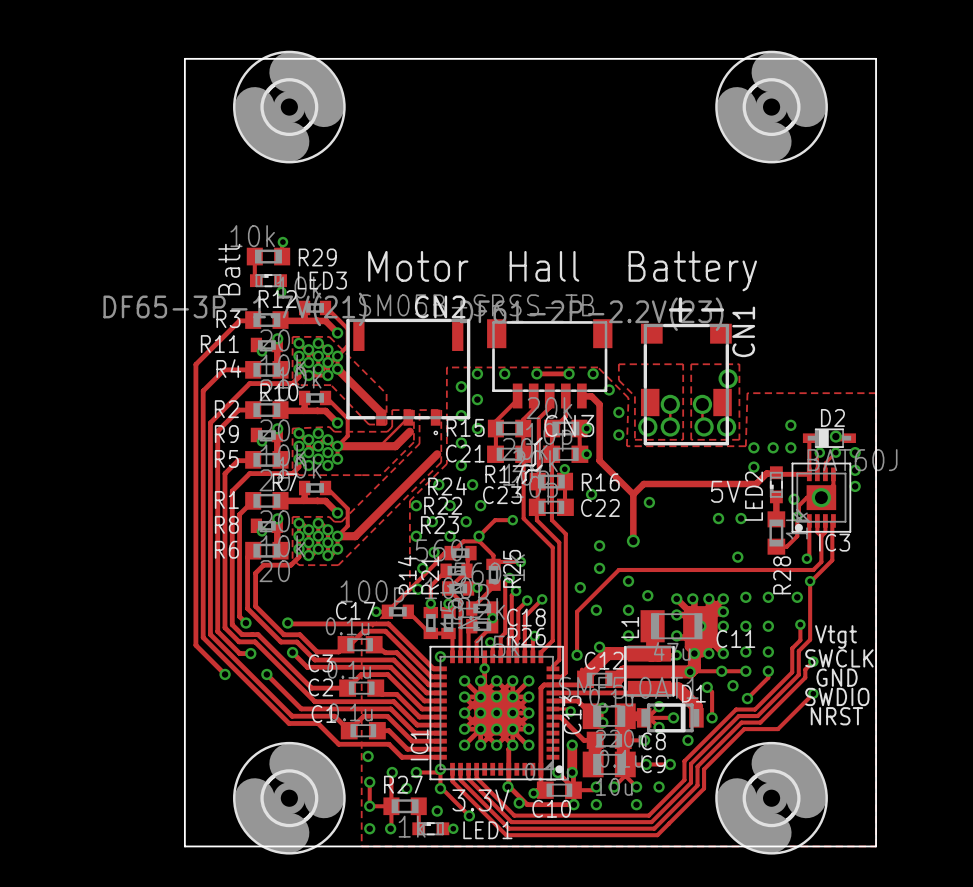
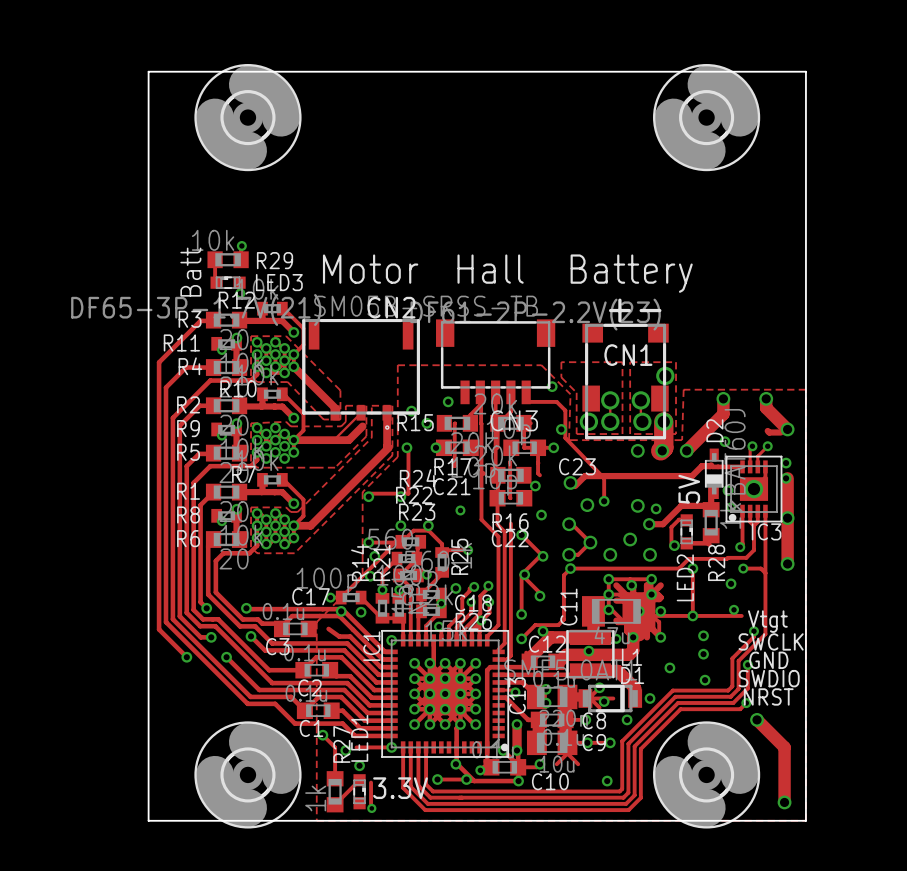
CN1 name rotation: 0° (743, 331) -> 90° clockwise (628, 355)
CN1 name position: CN1 (743, 331) -> CN1 (628, 355)
via: (477, 373) -> none
via: (504, 373) -> none
track: (536, 373) (569, 373) -> none
via: (536, 373) -> none
via: (569, 373) -> none
via: (593, 373) -> none
via: (461, 386) -> none
track: (581, 395) (591, 396) (599, 404) (599, 460) (633, 494) (633, 541) -> (526, 392) (527, 401) (556, 401) (565, 410) (565, 438) (604, 478) (604, 501)
via: (477, 399) -> none
track: (517, 399) (495, 421) (495, 454) -> none
track: none -> (723, 398) (723, 414) (686, 450)
via: none -> (723, 398)
track: none -> (766, 398) (766, 408) (787, 429)
via: none -> (766, 398)
via: none -> (448, 401)
track: (549, 407) (538, 418) (536, 520) (551, 535) -> (495, 403) (497, 524)
via: (618, 412) -> none
track: none -> (387, 413) (388, 447)
via: (790, 425) -> none
track: (520, 426) (523, 428) (523, 518) (534, 529) -> (480, 392) (481, 519)
track: none -> (663, 421) (663, 447) (660, 450)
track: none -> (455, 423) (454, 466)
via: (586, 428) -> none
via: none -> (787, 429)
via: (835, 436) -> none
line: (541, 438) (535, 444) (535, 463) (524, 465) -> none
track: (809, 438) (809, 474) -> none
D2 rotation: 0° (829, 438) -> 90° counterclockwise (714, 473)
D2 position: (829, 438) -> (714, 473)
via: (461, 443) -> none
via: (753, 447) -> none
via: (773, 447) -> none
via: (855, 452) -> none
C21 name position: C21 (465, 453) -> C21 (452, 486)
track: none -> (406, 447) (408, 493) (370, 493)
via: none -> (406, 447)
via: none -> (436, 447)
track: (551, 454) (551, 520) (565, 534) -> none
C23 position: (565, 454) -> (524, 447)
via: (586, 454) -> none
track: none -> (553, 447) (538, 447) (538, 473) (539, 475)
via: none -> (553, 447)
via: none -> (637, 450)
via: none -> (662, 450)
via: none -> (686, 450)
via: (461, 465) -> none
line: (541, 465) (536, 470) (528, 470) (522, 483) -> none
via: (753, 467) -> none
via: (564, 469) -> none
R16 position: (551, 481) -> (510, 475)
R16 name position: R16 (600, 482) -> R16 (510, 521)
via: (438, 484) -> none
via: (472, 484) -> none
LED2 rotation: 0° (776, 484) -> 180° (686, 531)
LED2 position: (776, 484) -> (686, 531)
R24 name position: R24 (447, 486) -> R24 (418, 478)
track: none -> (787, 478) (787, 563)
via: none -> (570, 482)
text rotation: 0° (725, 491) -> 90° counterclockwise (689, 489)
C23 name position: C23 (502, 495) -> C23 (577, 466)
LED2 name position: LED2 (754, 496) -> LED2 (685, 577)
track: (821, 497) (806, 497) (798, 505) (797, 536) (786, 546) (776, 546) -> none
via position: (649, 502) -> (604, 501)
R22 name position: R22 (443, 505) -> R22 (414, 495)
via: (480, 505) -> none
C22 position: (551, 507) -> (510, 498)
C22 name position: C22 (600, 507) -> C22 (510, 538)
via: none -> (587, 505)
via: none -> (637, 505)
track: none -> (708, 505) (681, 505) (662, 524) (649, 524)
via: (741, 518) -> none
track: (512, 520) (495, 520) (479, 536) -> none
track: (833, 520) (832, 560) (811, 581) -> (765, 573) (760, 568) (744, 568)
via: (432, 521) -> none
via: (466, 521) -> none
via: none -> (541, 515)
R23 name position: R23 (439, 525) -> R23 (417, 512)
via: none -> (787, 518)
track: none -> (686, 520) (679, 519) (671, 527) (671, 547)
track: none -> (569, 524) (572, 524) (590, 542) (578, 554) (569, 554)
via: none -> (569, 524)
via: (416, 536) -> none
via position: (633, 541) -> (649, 524)
track: none -> (521, 534) (541, 554) (521, 574)
via: none -> (521, 534)
via: (599, 545) -> none
via: none -> (630, 539)
via: (434, 552) -> none
via: none -> (368, 542)
track: none -> (400, 541) (368, 542)
via: none -> (590, 542)
track: none -> (686, 543) (709, 544)
via: none -> (569, 554)
via: none -> (610, 554)
via: none -> (650, 554)
track: (794, 569) (618, 569) (577, 611) -> (727, 557) (688, 558) (679, 568) (570, 568) (563, 575) (563, 619) (558, 625) (535, 625) (520, 638)
via: none -> (787, 563)
track: (509, 578) (505, 582) (505, 632) (500, 637) (500, 641) -> (469, 588) (469, 591) (462, 598) (462, 613) (449, 626)
via: (509, 578) -> none
track: none -> (692, 568) (692, 615)
via: none -> (692, 568)
track: (810, 581) (810, 639) (798, 651) (798, 674) (757, 716) -> (765, 511) (765, 634) (738, 661) (738, 688) (730, 696) (693, 696)
track: none -> (521, 574) (521, 597)
track: none -> (521, 574) (541, 594)
track: (516, 590) (511, 595) (511, 635) (508, 638) (508, 643) -> (471, 602) (471, 612) (456, 627)
via: (516, 590) -> none
via: none -> (608, 579)
via: none -> (651, 579)
via: (647, 595) -> none
via: (745, 597) -> none
via: (768, 597) -> none
via: (676, 598) -> none
via: (708, 598) -> none
via: (723, 598) -> none
track: (542, 599) (524, 616) (524, 646) -> (489, 602) (489, 612) (471, 630)
track: (527, 600) (518, 609) (516, 645) -> (487, 588) (480, 596) (480, 613) (464, 629)
via: none -> (455, 588)
track: none -> (608, 594) (619, 594) (640, 615) (741, 615)
via: none -> (608, 594)
via: none -> (651, 594)
via: (628, 610) -> none
via: (723, 611) -> none
via: (676, 614) -> none
via: none -> (471, 602)
via: none -> (489, 602)
via: none -> (608, 609)
track: (800, 624) (800, 640) (792, 648) (792, 672) (755, 709) -> (753, 631) (753, 636) (732, 658) (732, 686) (728, 690) (690, 690)
via: none -> (341, 611)
via: (745, 626) -> none
via: (768, 626) -> none
via: none -> (361, 612)
L1 name rotation: 0° (630, 627) -> 90° clockwise (632, 657)
L1 name position: L1 (630, 627) -> L1 (632, 657)
track: (577, 629) (577, 655) -> none
via: none -> (521, 614)
track: (363, 631) (350, 644) (346, 644) (338, 651) (317, 651) (304, 639) -> (318, 616) (292, 616) (281, 626) (281, 628)
via: none -> (692, 615)
via: (628, 635) -> none
via: (676, 635) -> none
track: none -> (622, 620) (611, 609) (608, 609) (608, 579) (651, 579) (651, 615) (659, 622) (659, 640)
C11 name rotation: 0° (735, 638) -> 90° counterclockwise (568, 607)
C11 name position: C11 (735, 638) -> C11 (568, 607)
track: none -> (262, 623) (284, 623)
C3 position: (360, 644) -> (295, 628)
via: none -> (753, 631)
via: (745, 651) -> none
via: (708, 653) -> none
track: (813, 661) (805, 669) (805, 677) (760, 722) -> (747, 664) (747, 688) (733, 702) (695, 702)
via: (813, 661) -> none
via: (484, 668) -> none
via: none -> (588, 651)
via: (690, 671) -> none
via: (721, 671) -> none
track: (745, 671) (690, 671) -> none
via: (745, 671) -> none
track: (768, 671) (768, 677) (747, 698) -> none
via: none -> (747, 664)
C2 name position: C2 (320, 687) -> C2 (309, 687)
track: (707, 687) (712, 692) (712, 717) -> none
via: (707, 687) -> none
track: (813, 693) (777, 729) -> (746, 703) (740, 709) (712, 709)
via: (813, 693) -> none
via: (747, 698) -> none
via: none -> (705, 680)
C1 name position: C1 (323, 713) -> C1 (311, 728)
via: (673, 717) -> none
via: none -> (604, 701)
via: none -> (746, 703)
via: (659, 727) -> none
track: none -> (757, 719) (784, 747) (784, 802)
via: none -> (757, 719)
IC1 name position: IC1 (419, 744) -> IC1 (371, 646)
track: none -> (324, 736) (335, 747) (335, 778)
track: (684, 761) (684, 780) (648, 815) -> (623, 739) (622, 788) (619, 791) (589, 791)
track: (690, 763) (690, 782) (651, 822) -> (629, 742) (628, 792) (623, 797) (592, 797)
track: (697, 766) (697, 785) (654, 828) -> (636, 744) (634, 795) (626, 803) (595, 803)
track: none -> (356, 747) (390, 747)
track: (704, 769) (704, 788) (657, 835) -> (642, 747) (640, 797) (628, 810) (598, 810)
track: (392, 772) (390, 828) -> none
track: (416, 772) (437, 772) (440, 769) (440, 786) (469, 815) -> none
via: (416, 772) -> none
track: (476, 777) (514, 815) -> (426, 755) (426, 784) (433, 791) (461, 791)
track: (468, 779) (511, 822) -> (418, 756) (418, 785) (430, 797) (459, 797)
track: (460, 780) (508, 828) -> (410, 757) (410, 786) (427, 803) (456, 803)
track: (452, 781) (506, 835) -> (403, 758) (403, 787) (425, 810) (454, 810)
track: (369, 782) (369, 806) (391, 806) -> none
via: (369, 782) -> none
via: (614, 786) -> none
via: (636, 786) -> none
via: (659, 786) -> none
via: (440, 788) -> none
text position: 3.3V (480, 800) -> 3.3V (400, 788)
track: none -> (359, 780) (335, 804)
track: none -> (437, 779) (474, 781)
via: (596, 804) -> none
via: (636, 804) -> none
via: none -> (607, 781)
via: (369, 806) -> none
R27 rotation: 0° (405, 806) -> 90° clockwise (335, 791)
C10 name position: C10 (551, 808) -> C10 (550, 781)
via: (437, 811) -> none
via position: (469, 815) -> (437, 779)
via: none -> (784, 802)
via: (369, 828) -> none
via: (390, 828) -> none
LED1 rotation: 0° (430, 828) -> 90° clockwise (359, 791)
LED1 position: (430, 828) -> (359, 791)
via: (453, 828) -> none
LED1 name position: LED1 (487, 830) -> LED1 (359, 738)
via: none -> (371, 808)

